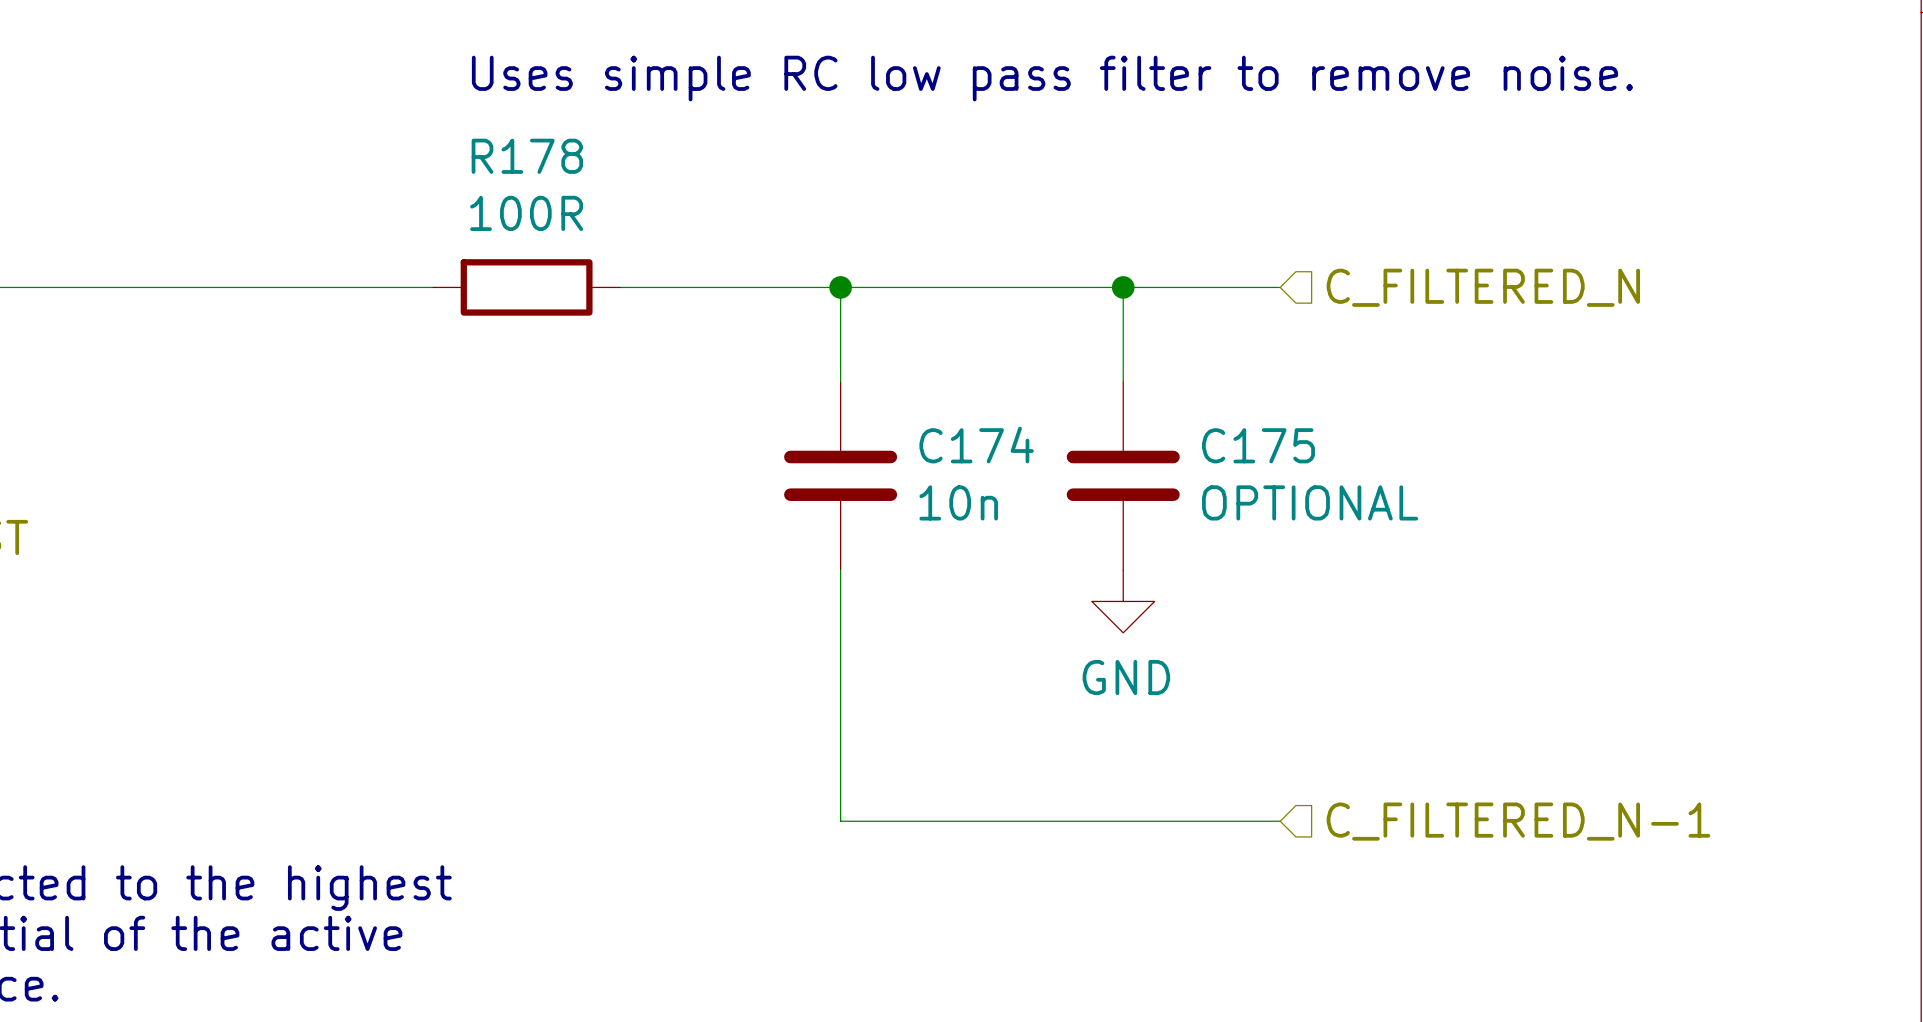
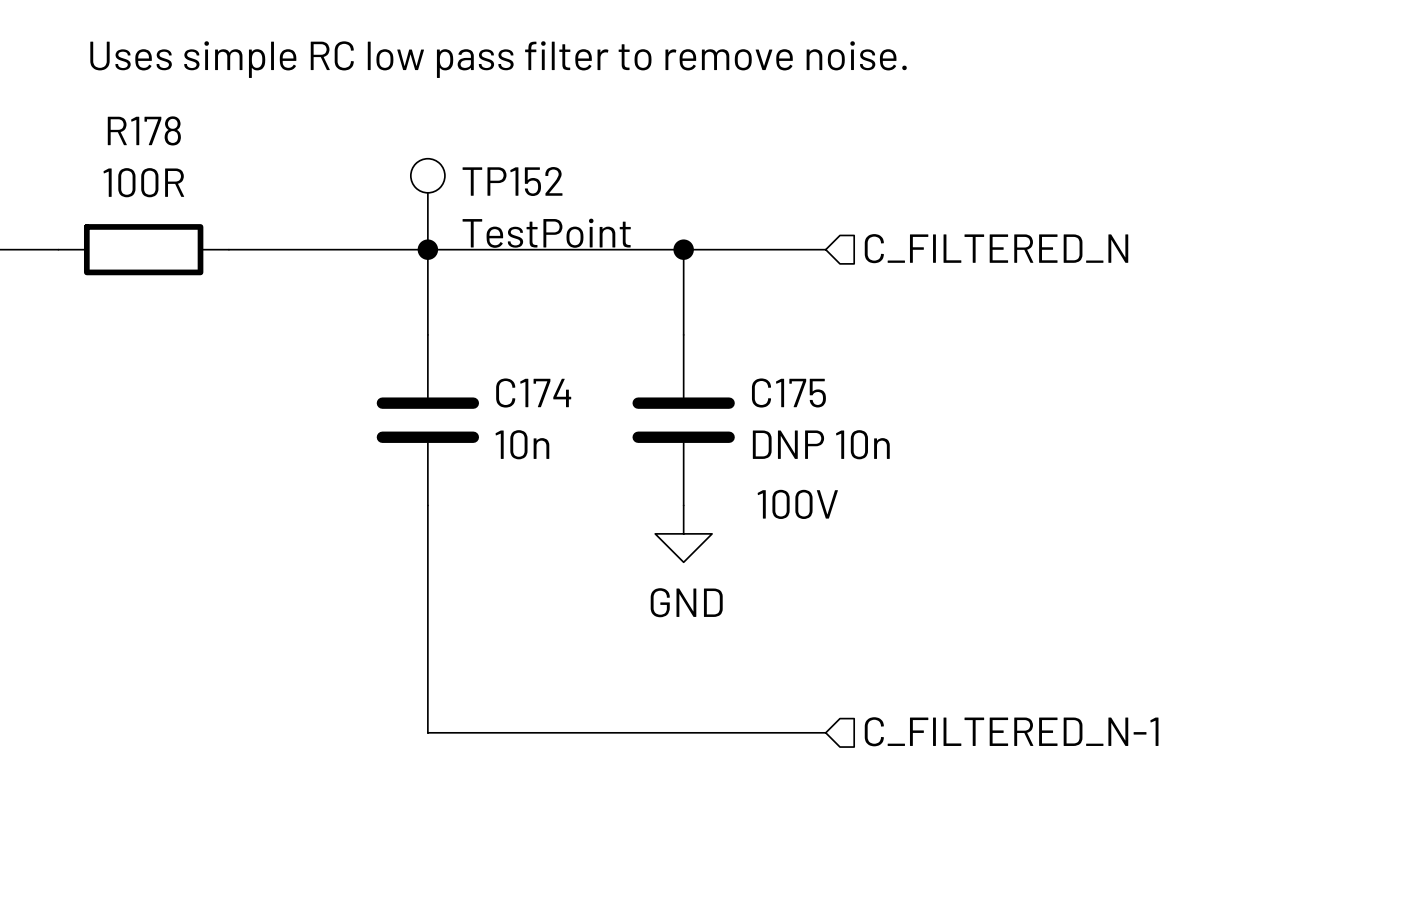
TP152: none -> TestPoint (427, 204)
C175 value: OPTIONAL (1310, 502) -> DNP 10n (821, 444)
C175 text: none -> 100V (797, 504)

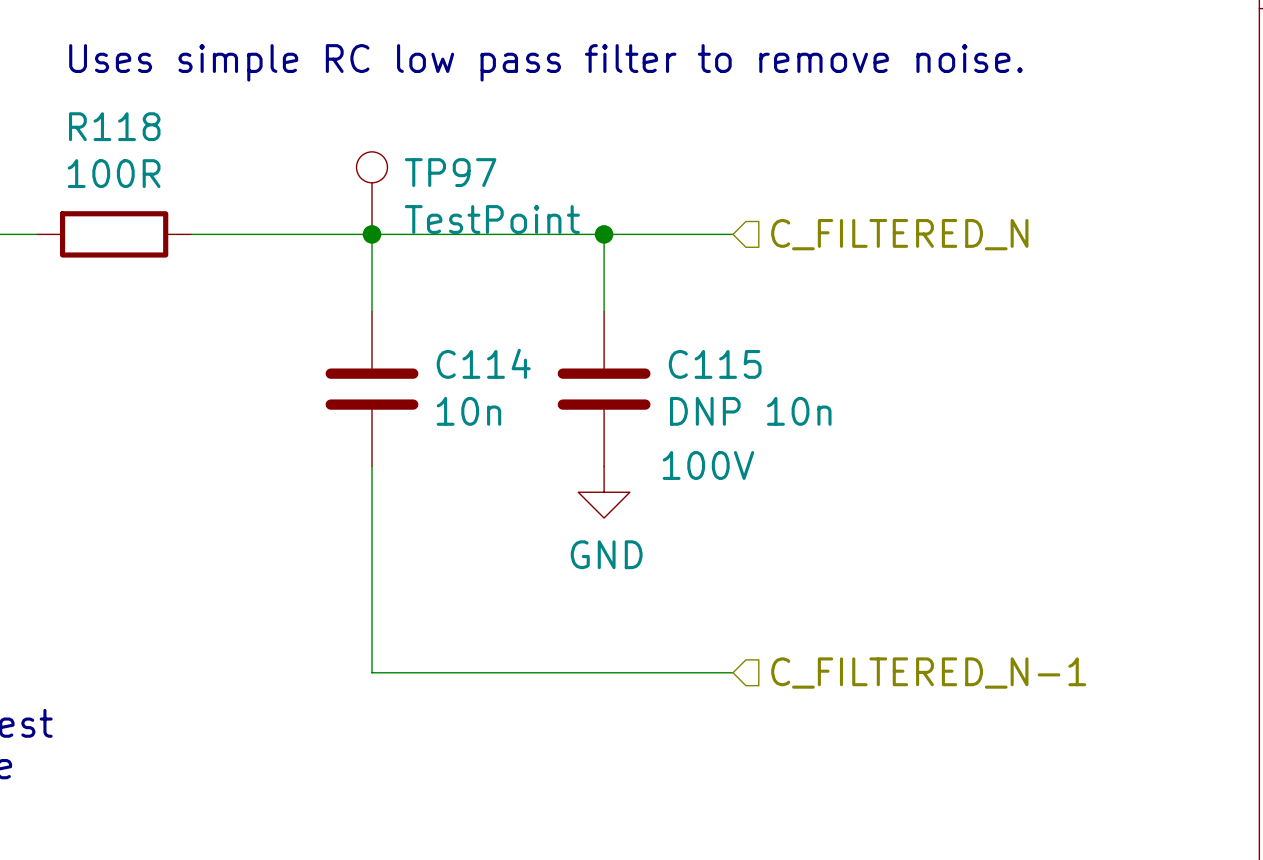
R178 name: R178 (144, 130) -> R118 (114, 126)
TP152 name: TP152 (512, 181) -> TP97 (450, 172)
C174 name: C174 (533, 393) -> C114 (483, 363)
C175 name: C175 (788, 393) -> C115 (715, 364)

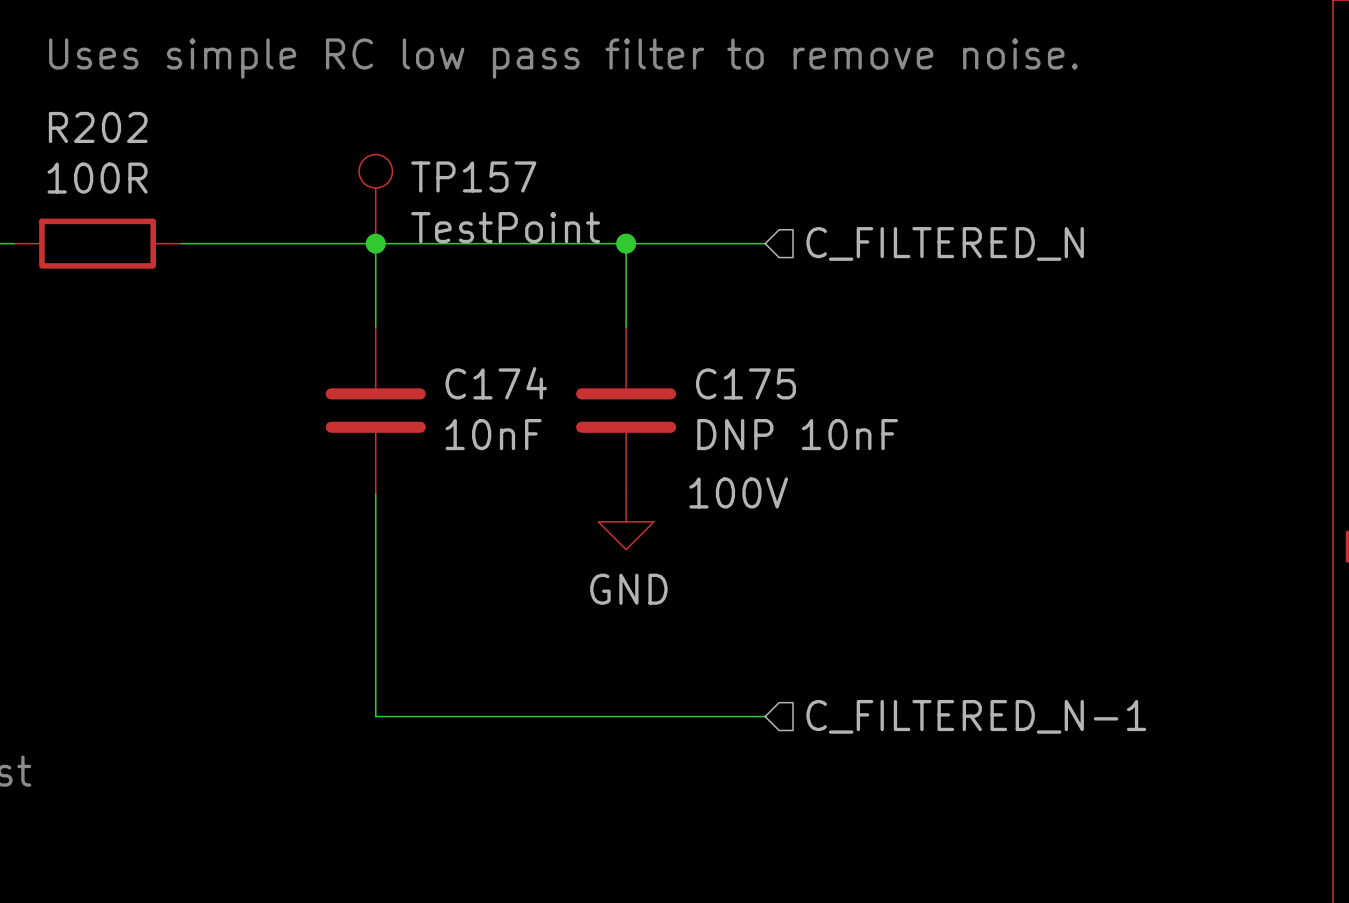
R118 name: R118 (114, 126) -> R202 (98, 127)
TP97 name: TP97 (450, 172) -> TP157 (473, 176)
C114 name: C114 (483, 363) -> C174 (496, 383)
C115 name: C115 (715, 364) -> C175 (745, 383)
C114 value: 10n (468, 411) -> 10nF (493, 434)
C115 value: DNP 10n (750, 411) -> DNP 10nF (797, 434)

